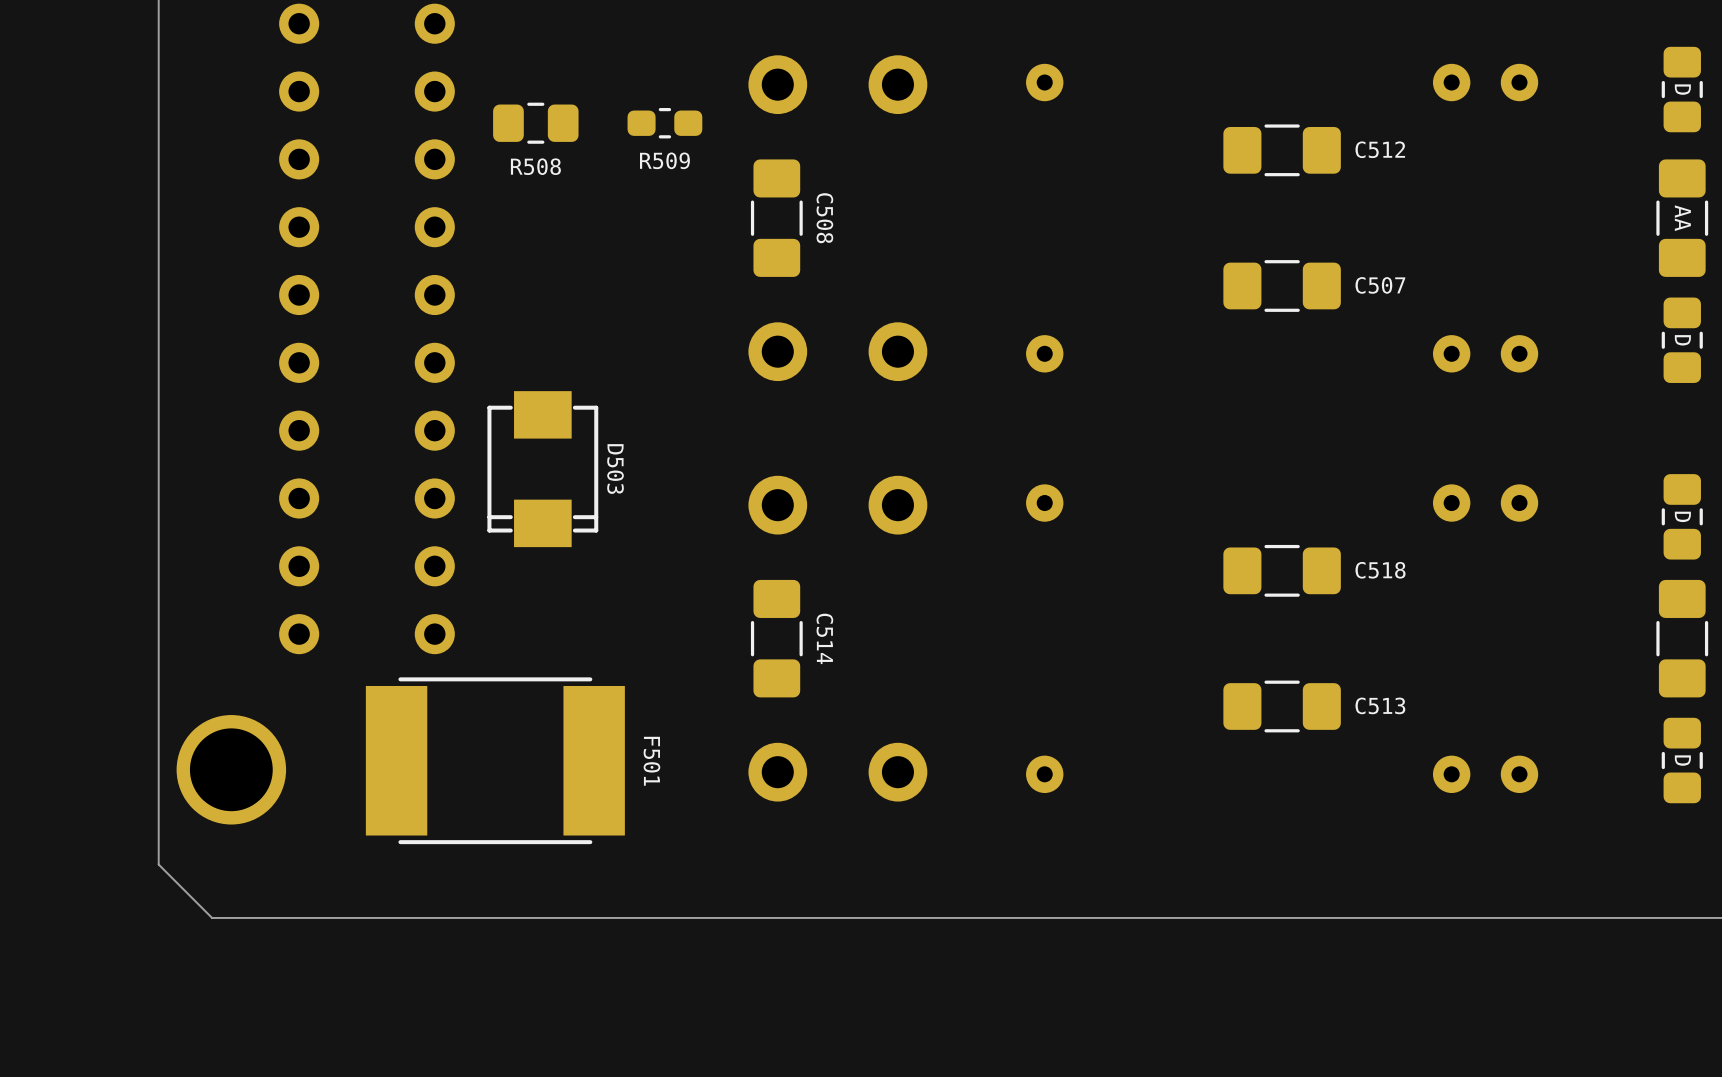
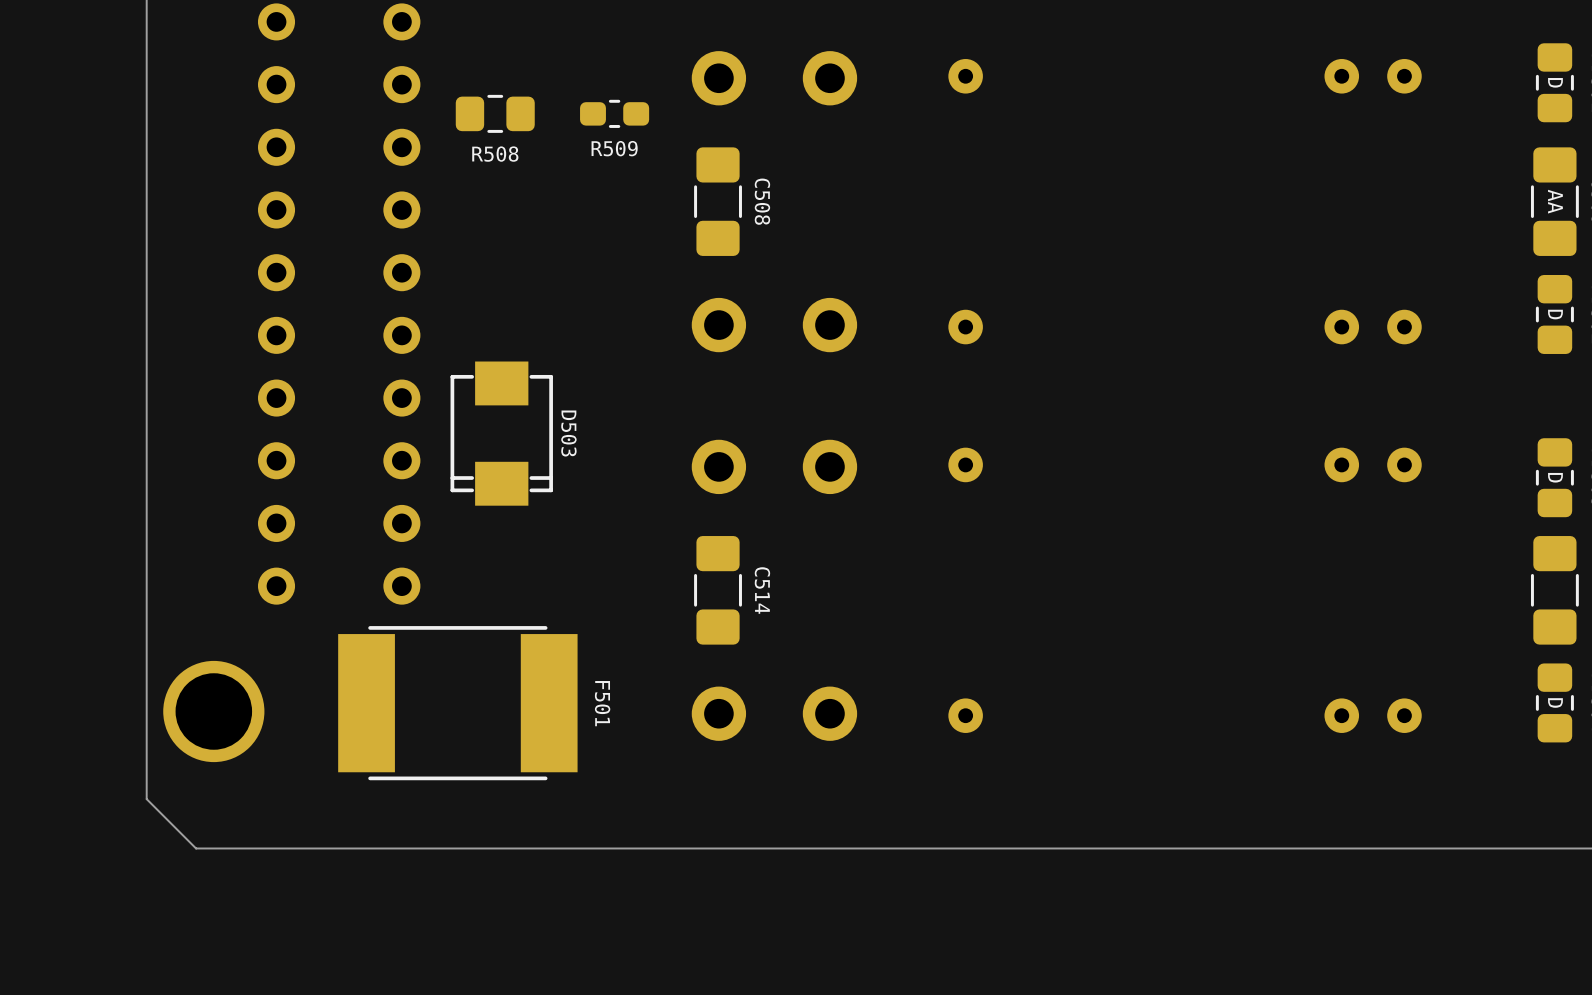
C512: (1282, 150) -> none
C507: (1282, 285) -> none
C518: (1282, 570) -> none
C513: (1282, 706) -> none

